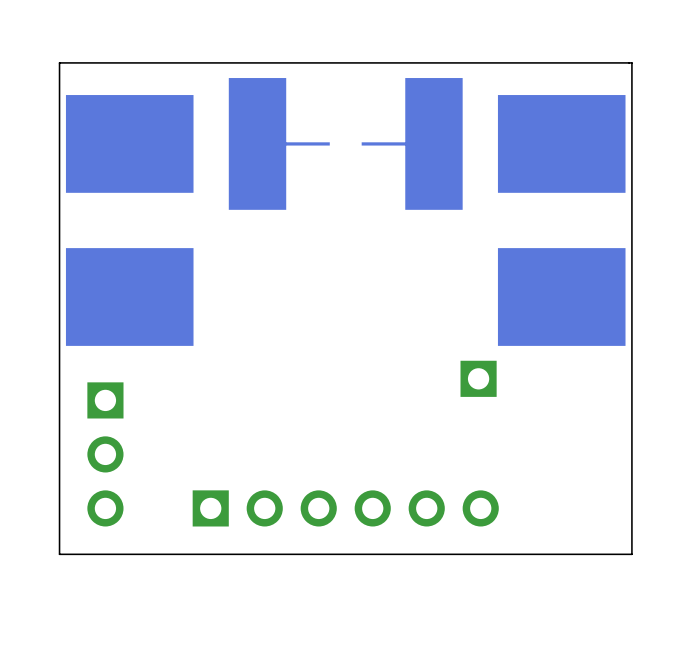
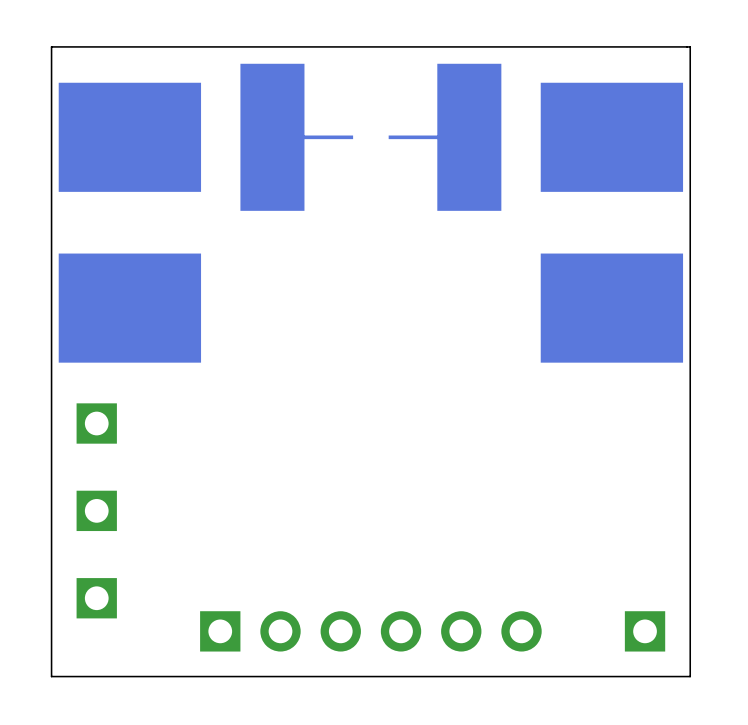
part: (478, 378) -> none
part: none -> (96, 423)
part: (105, 454) -> none
part: none -> (96, 510)
part position: (345, 508) -> (370, 631)
board edge: (631, 554) (59, 554) -> (690, 595) (690, 676) (51, 676) (51, 595)
part: none -> (96, 598)
part: none -> (645, 631)

